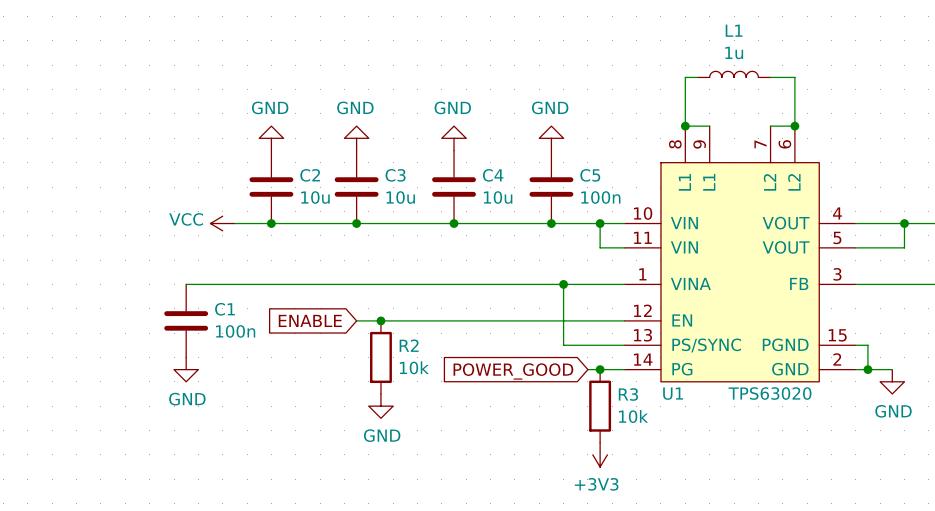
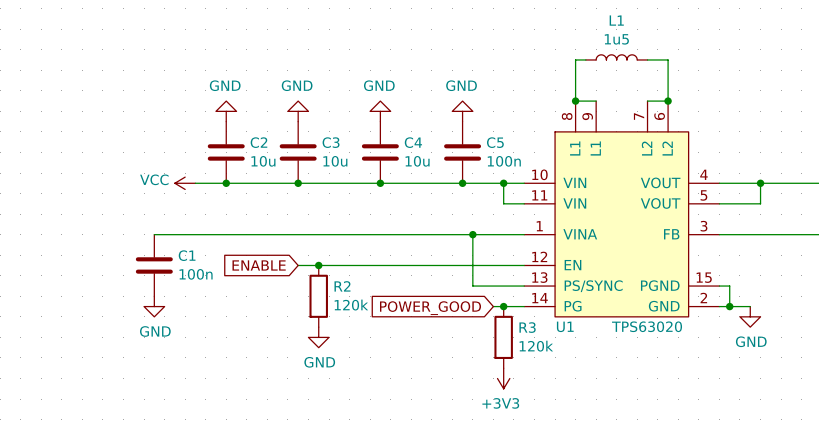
L1 value: 1u (734, 52) -> 1u5 (616, 39)
R2 value: 10k (414, 367) -> 120k (351, 305)
R3 value: 10k (633, 416) -> 120k (536, 346)

